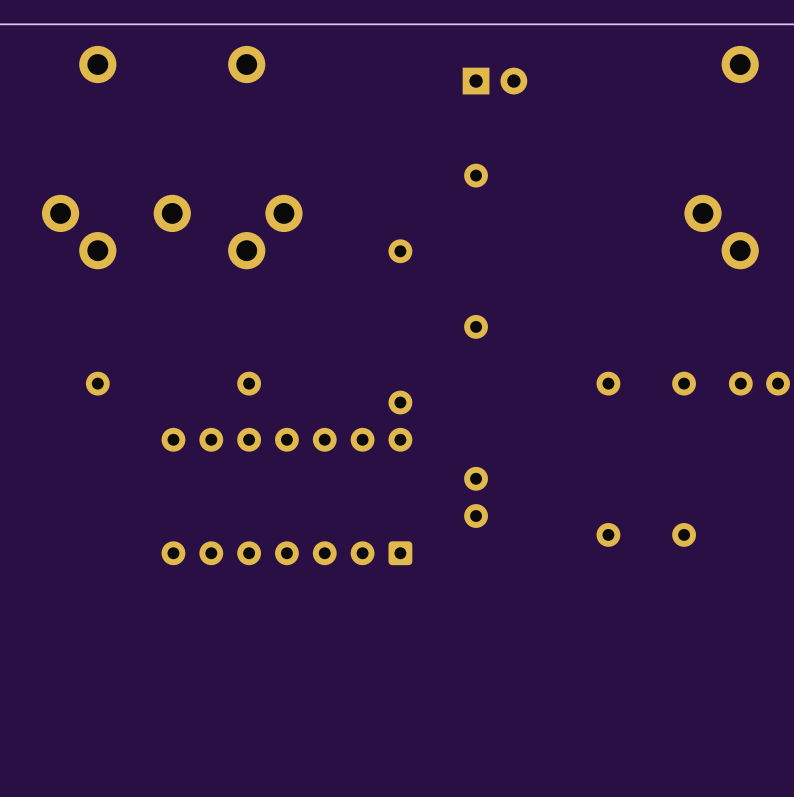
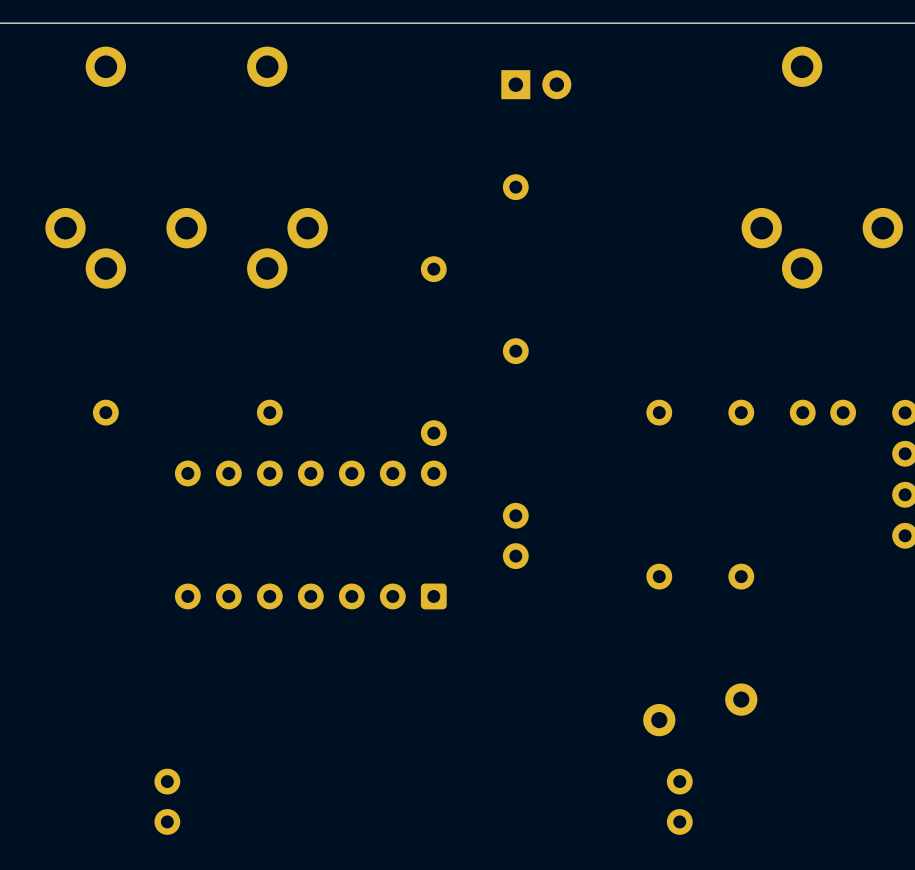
part: none -> (741, 699)
part: none -> (659, 720)
part: none -> (167, 801)
part: none -> (679, 801)

